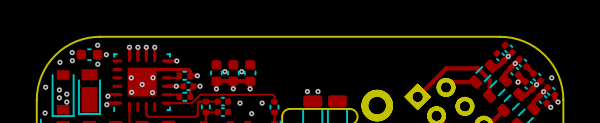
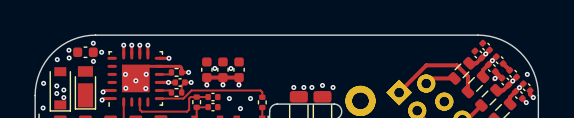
via: none -> (322, 85)
via: none -> (311, 87)
via: none -> (333, 87)

